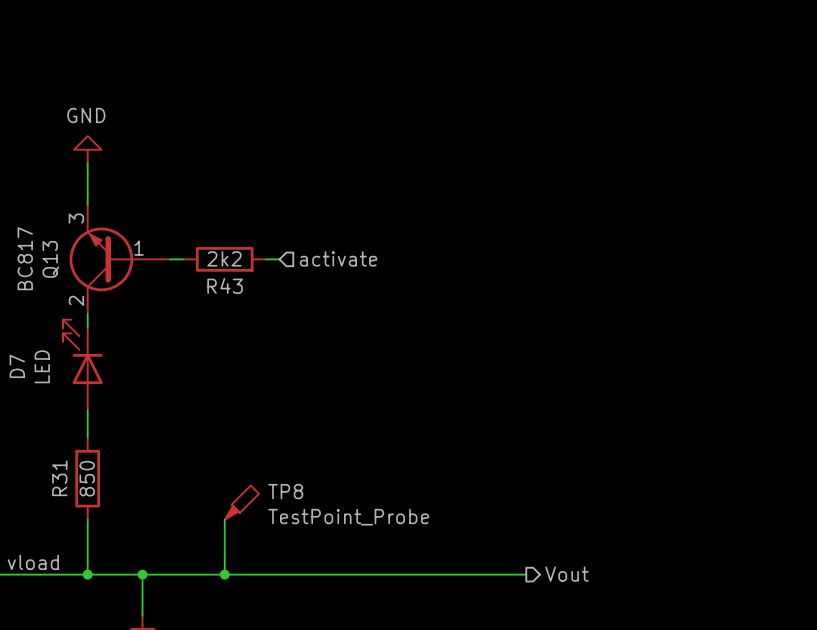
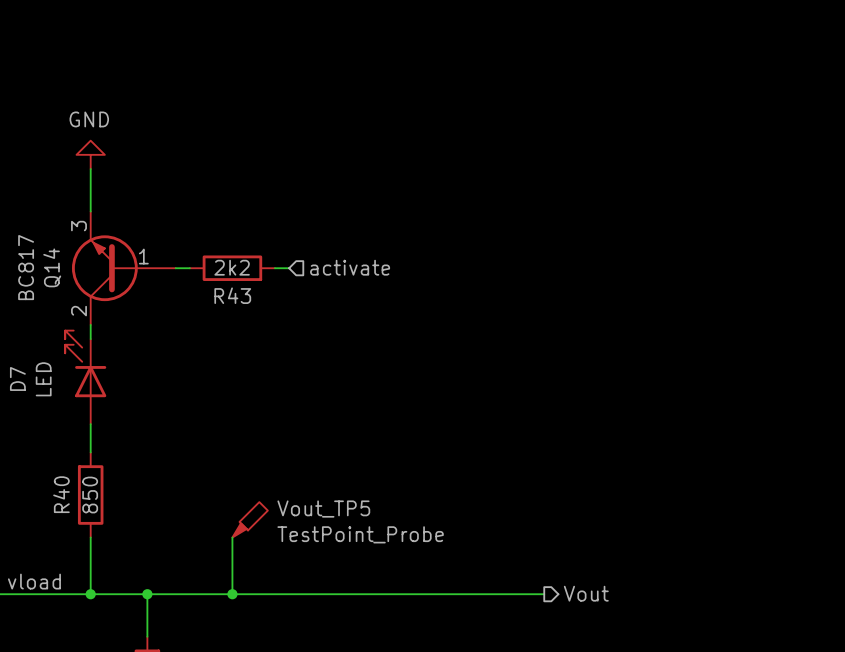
Q13 name: Q13 (50, 259) -> Q14 (52, 267)
R31 name: R31 (59, 478) -> R40 (61, 494)
TP8 name: TP8 (285, 491) -> Vout_TP5 (323, 509)

